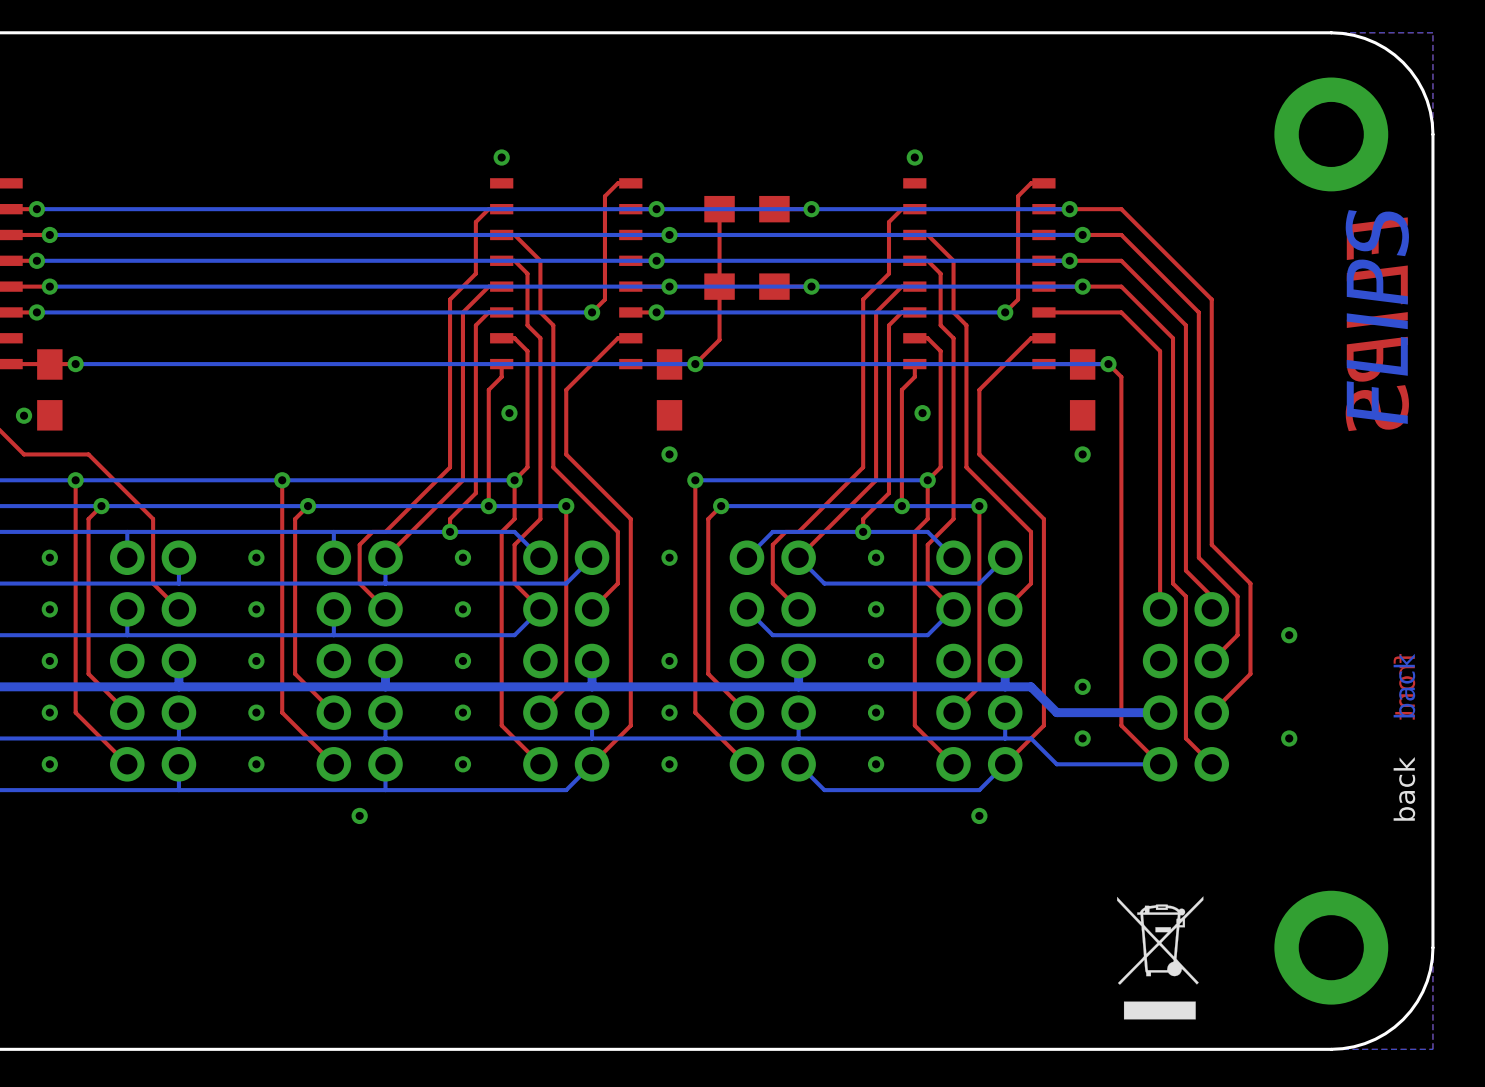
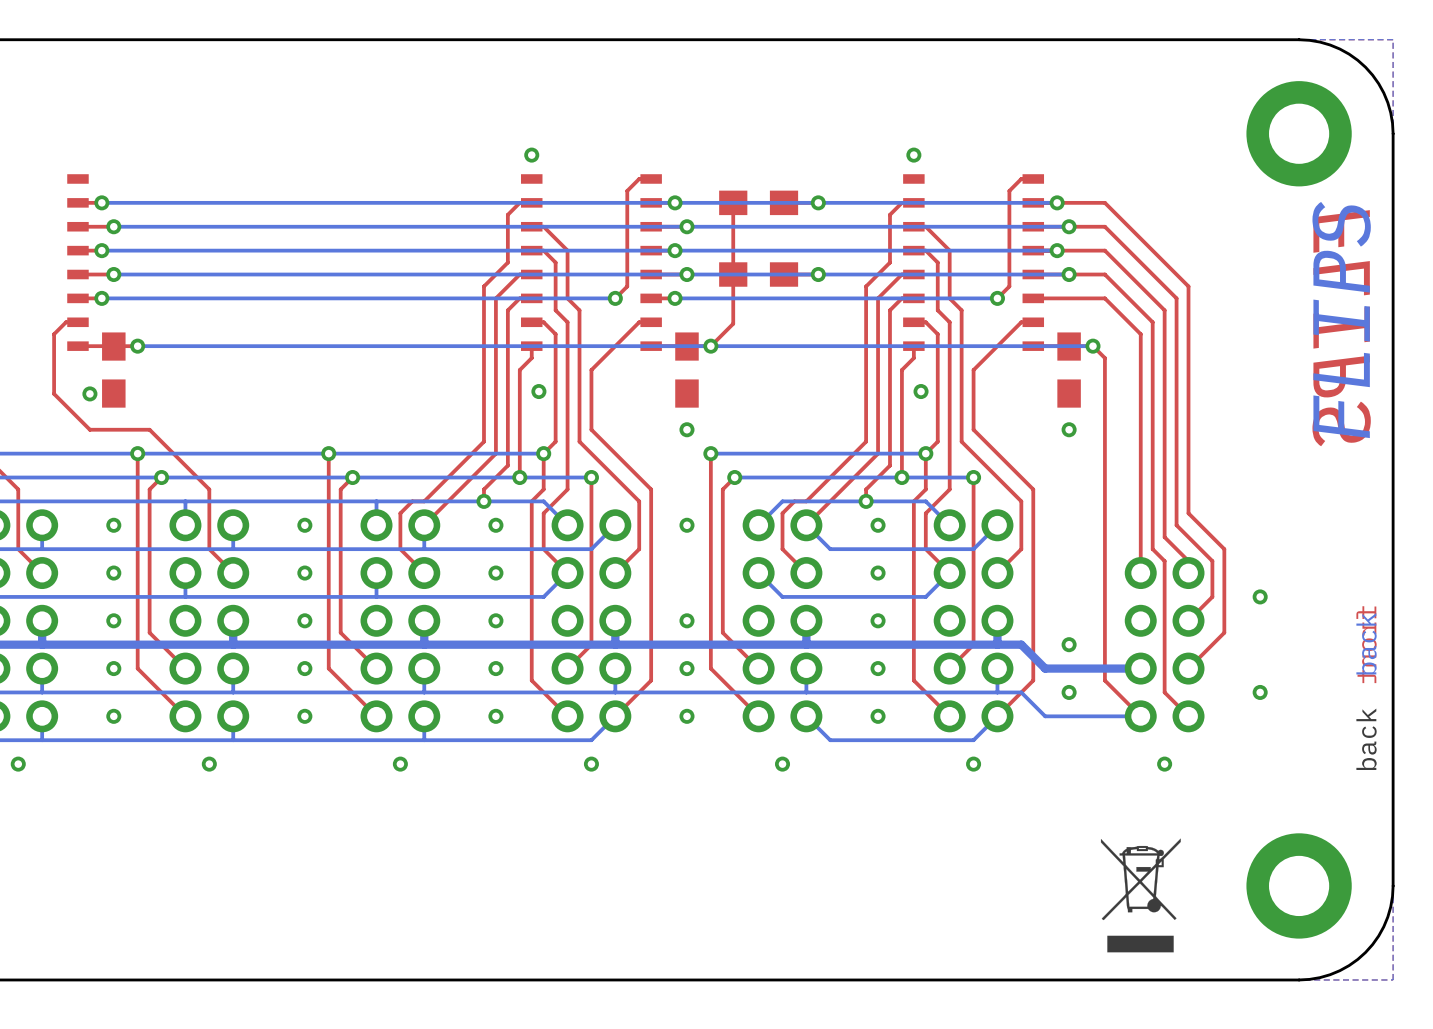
via: none -> (209, 764)
via: none -> (591, 764)
via: none -> (782, 764)
via: none -> (1164, 764)

